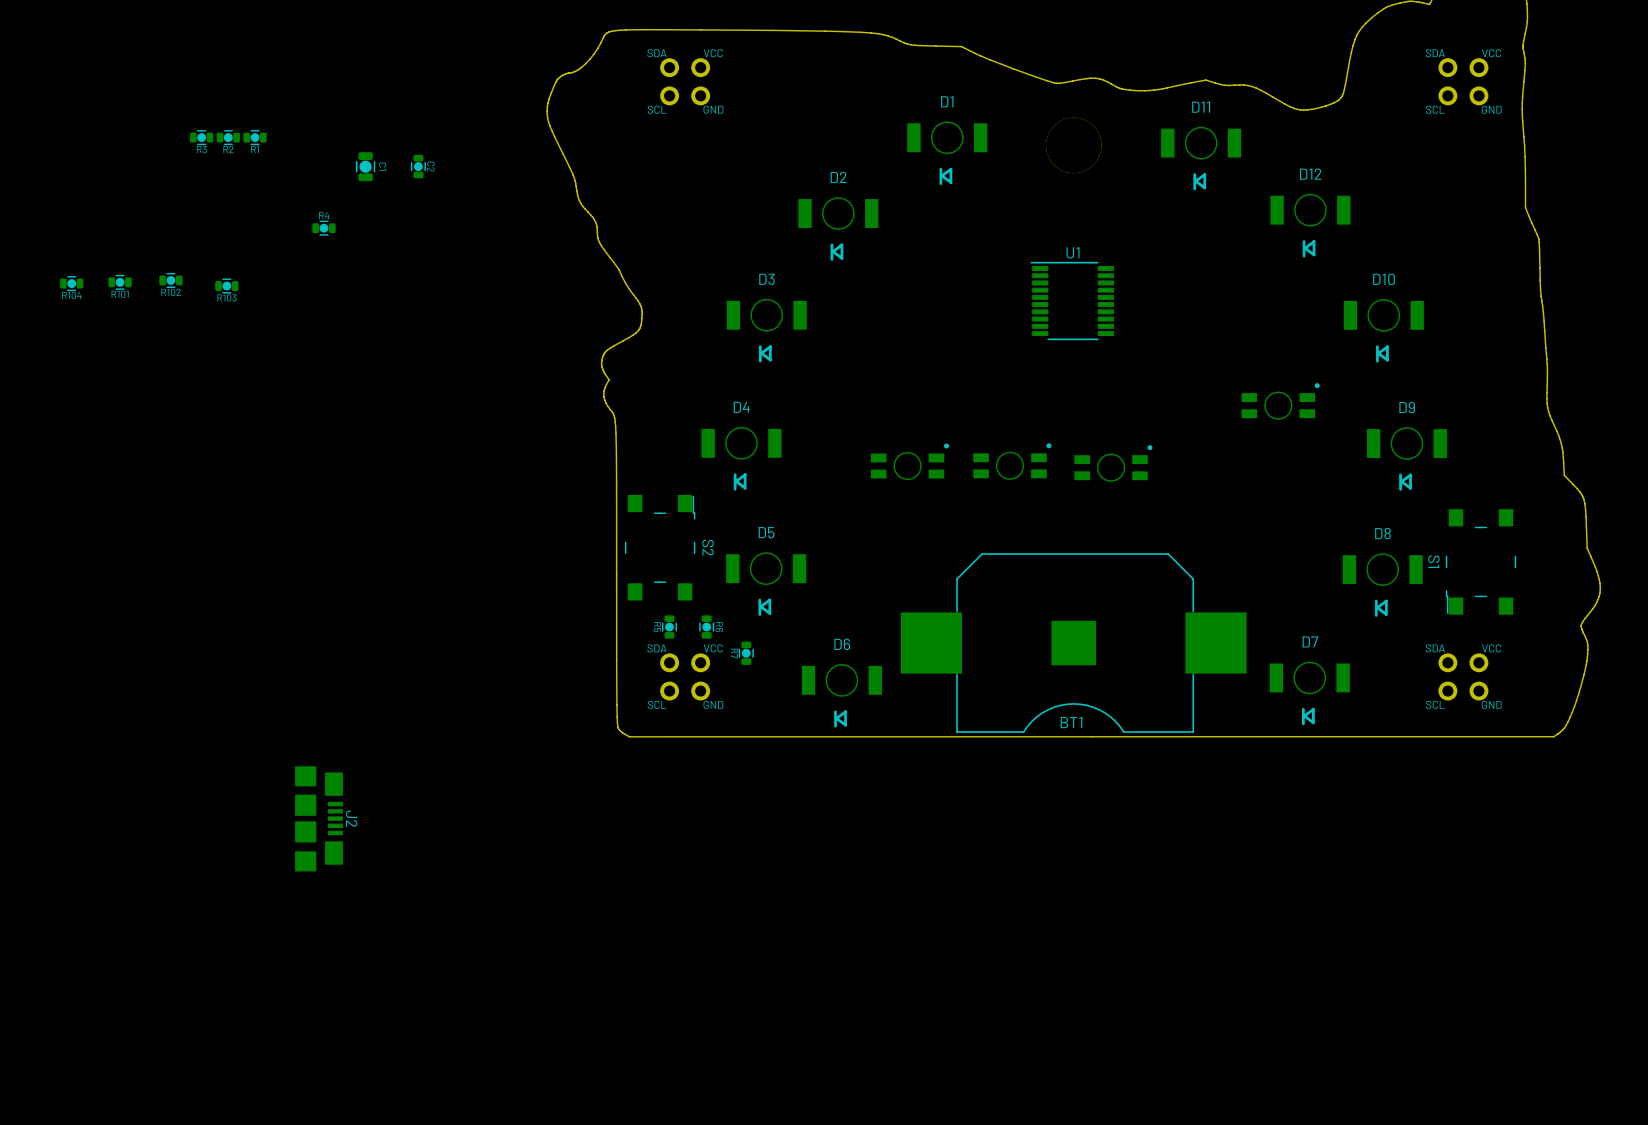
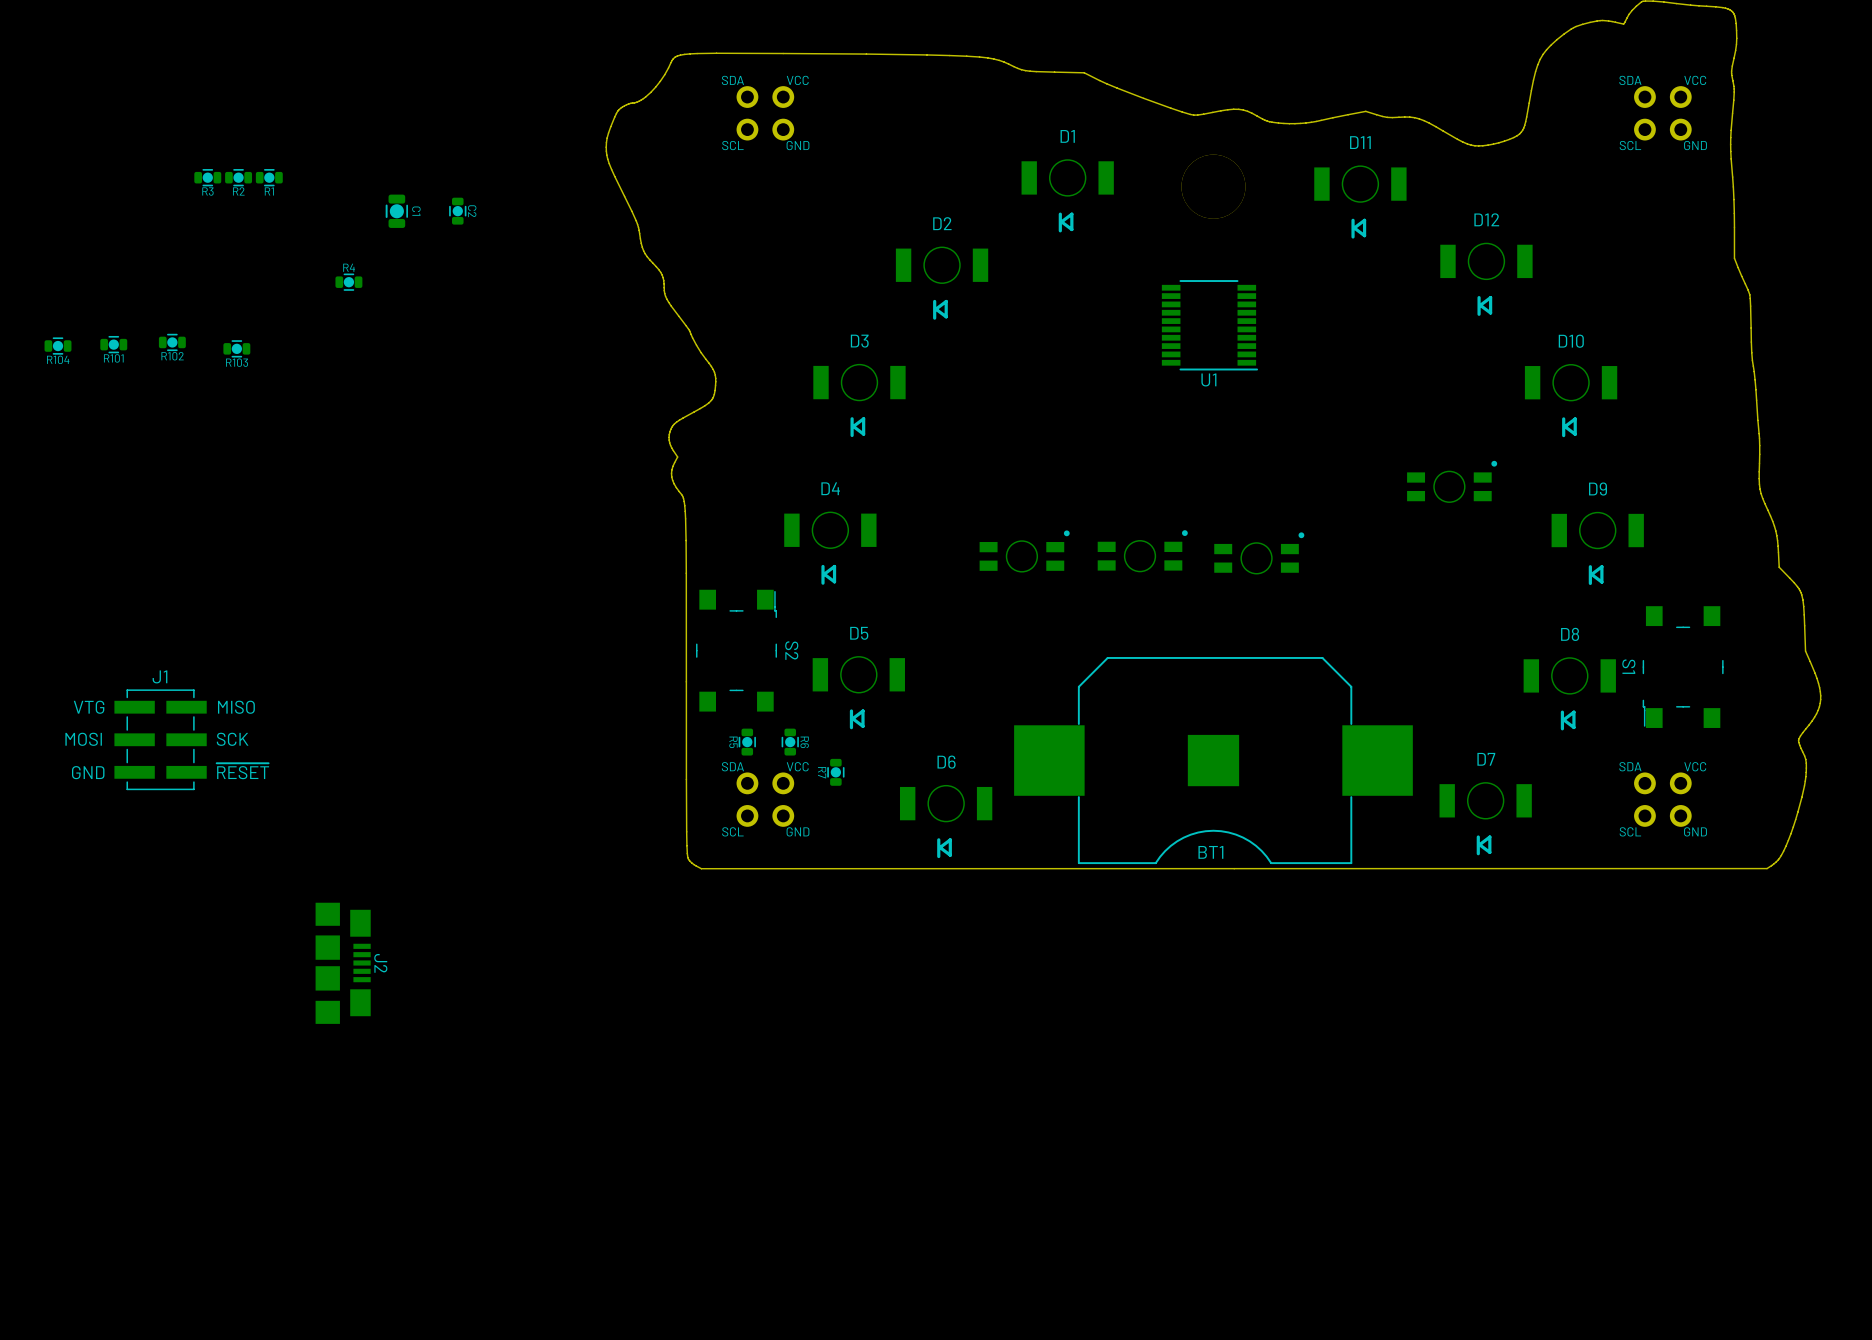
U1 rotation: 0° (1072, 301) -> 180° (1209, 325)
J1: none -> (160, 739)

